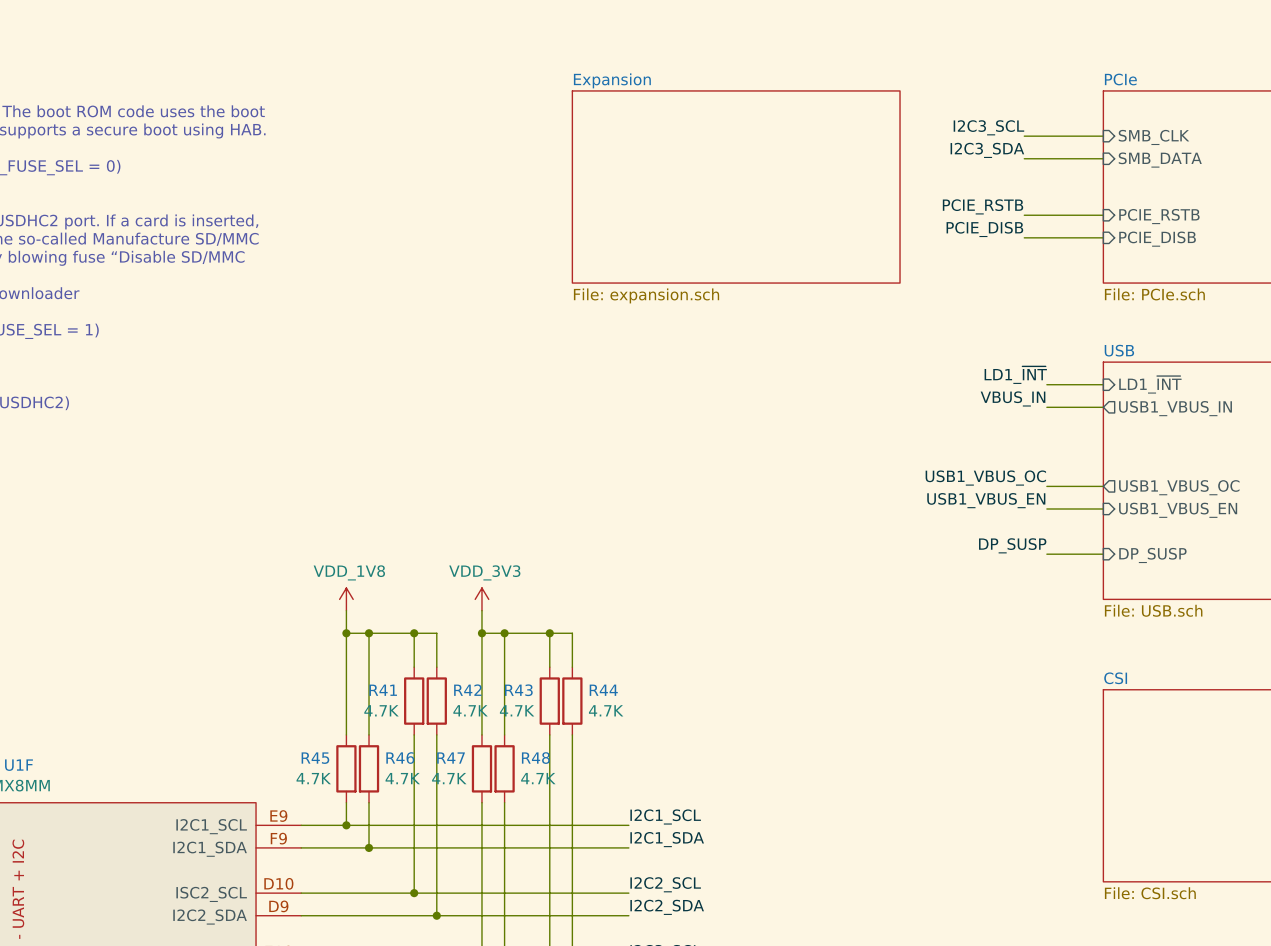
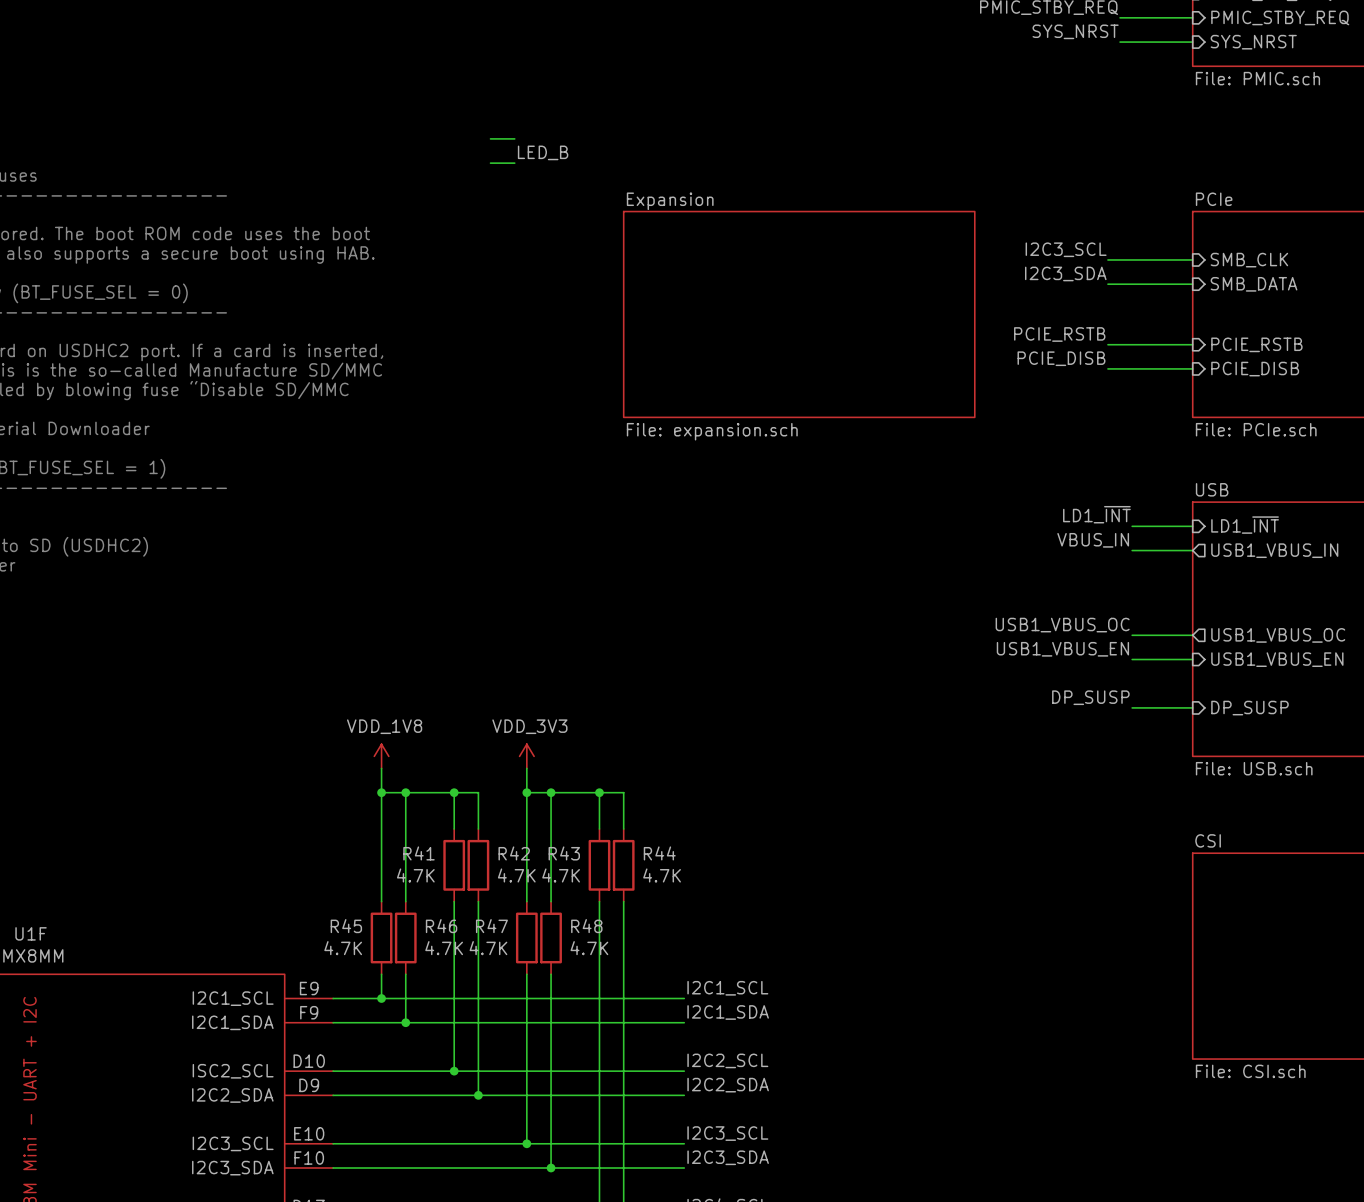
wire: none -> (490, 138) (514, 138)
label: none -> LED_B (543, 152)
wire: none -> (490, 163) (514, 163)

